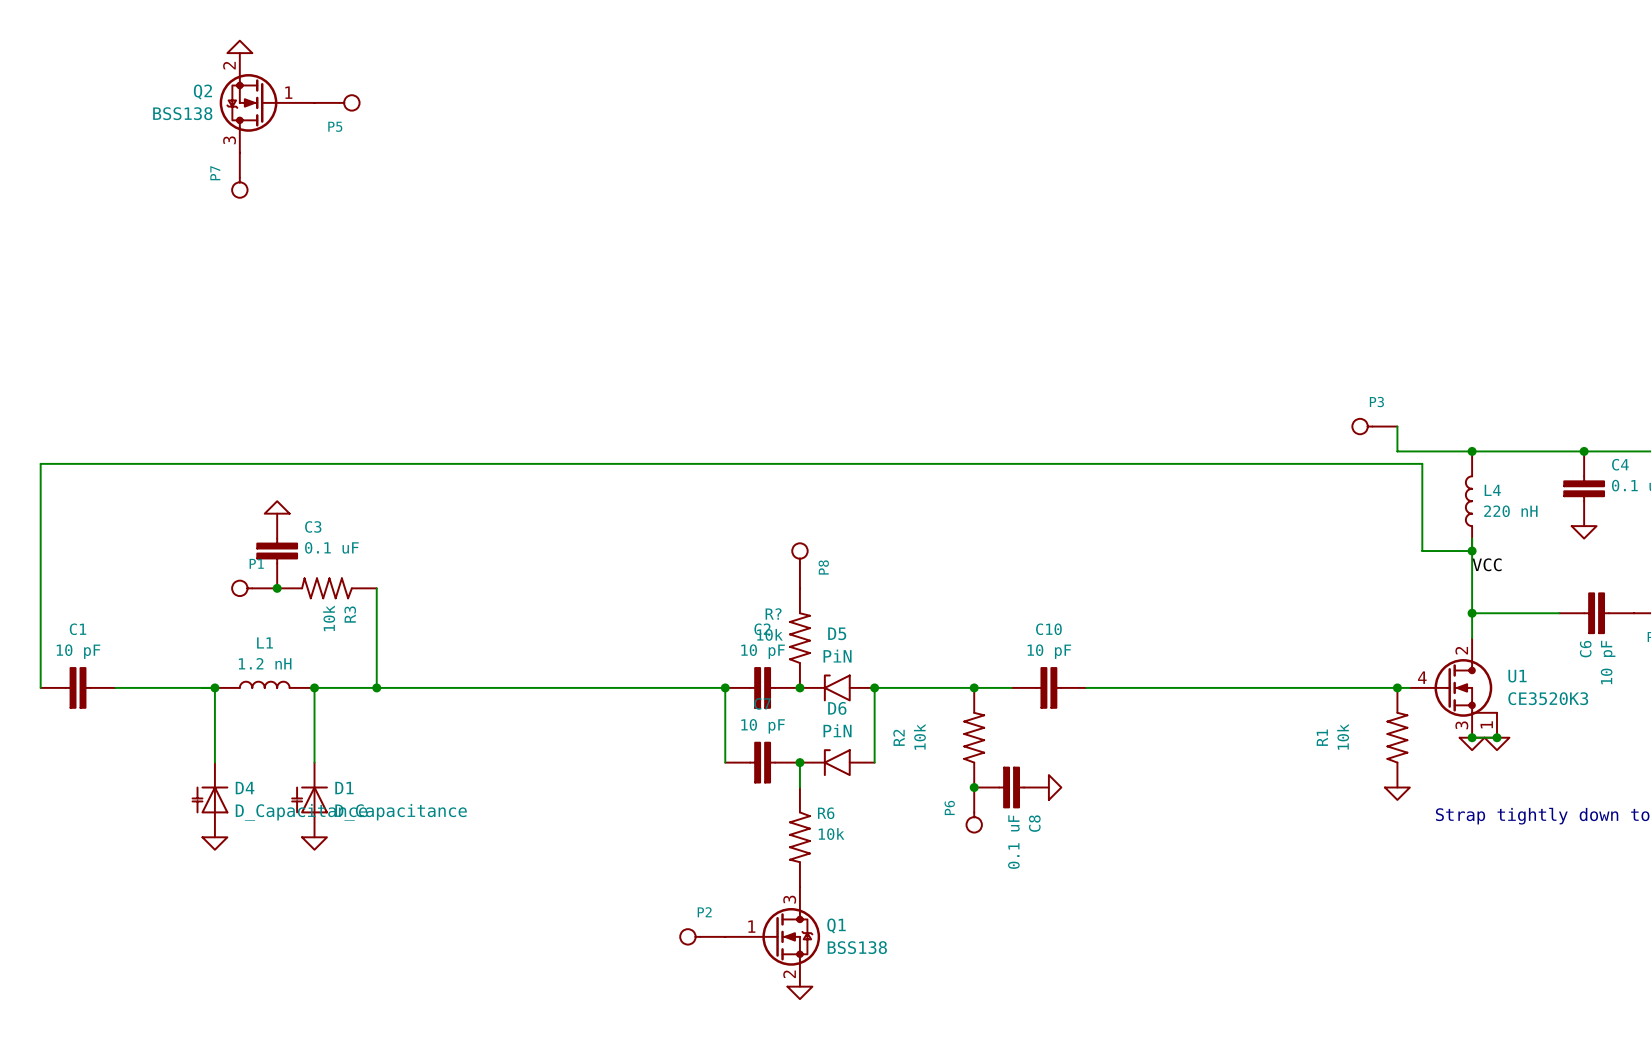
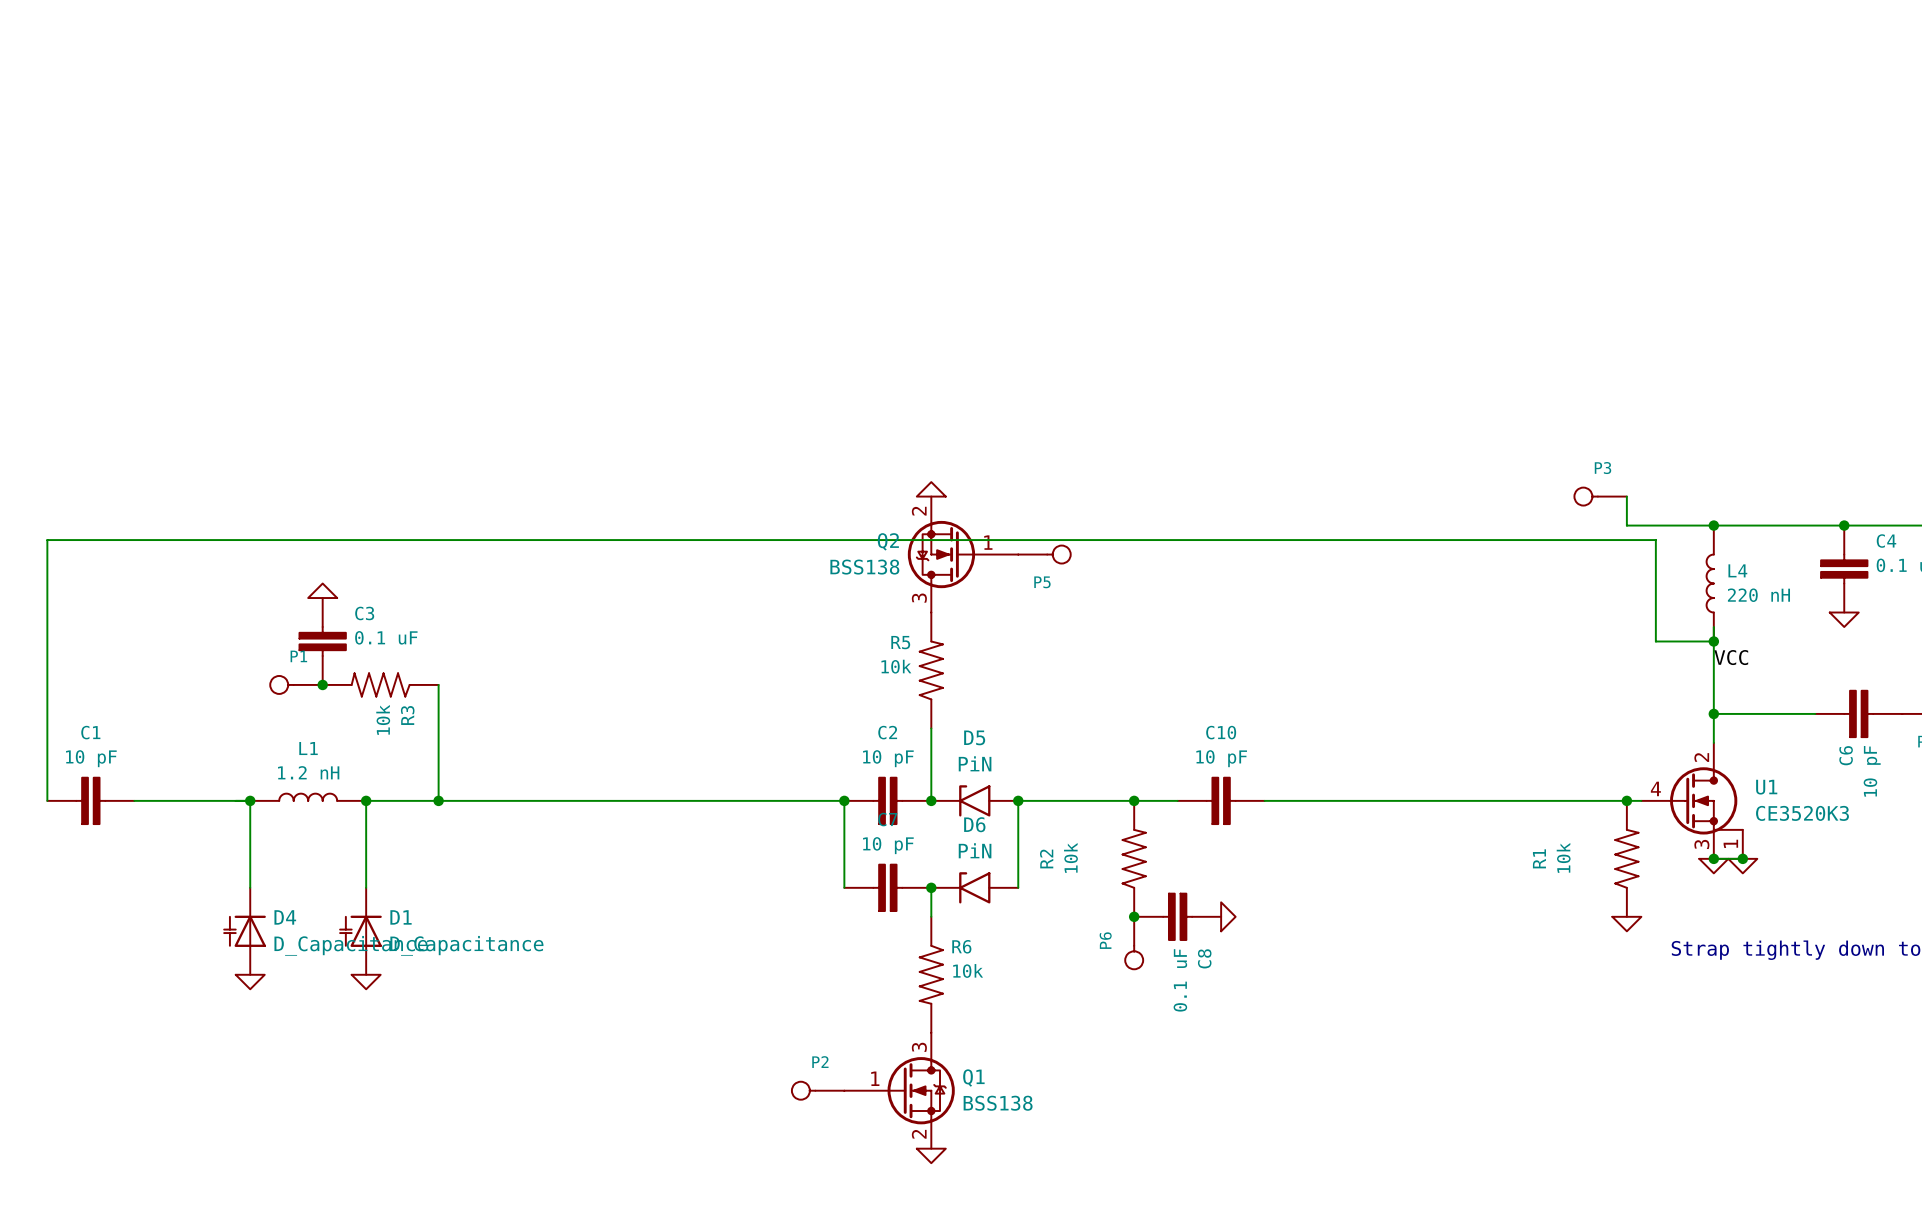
power symbol: (239, 46) -> none
Q2 position: (267, 102) -> (963, 554)
P5 position: (337, 102) -> (1044, 554)
P7: (239, 175) -> none
power symbol: none -> (931, 489)
P8: (799, 565) -> none
R5: none -> 10k (931, 670)
R?: 10k (799, 638) -> none

